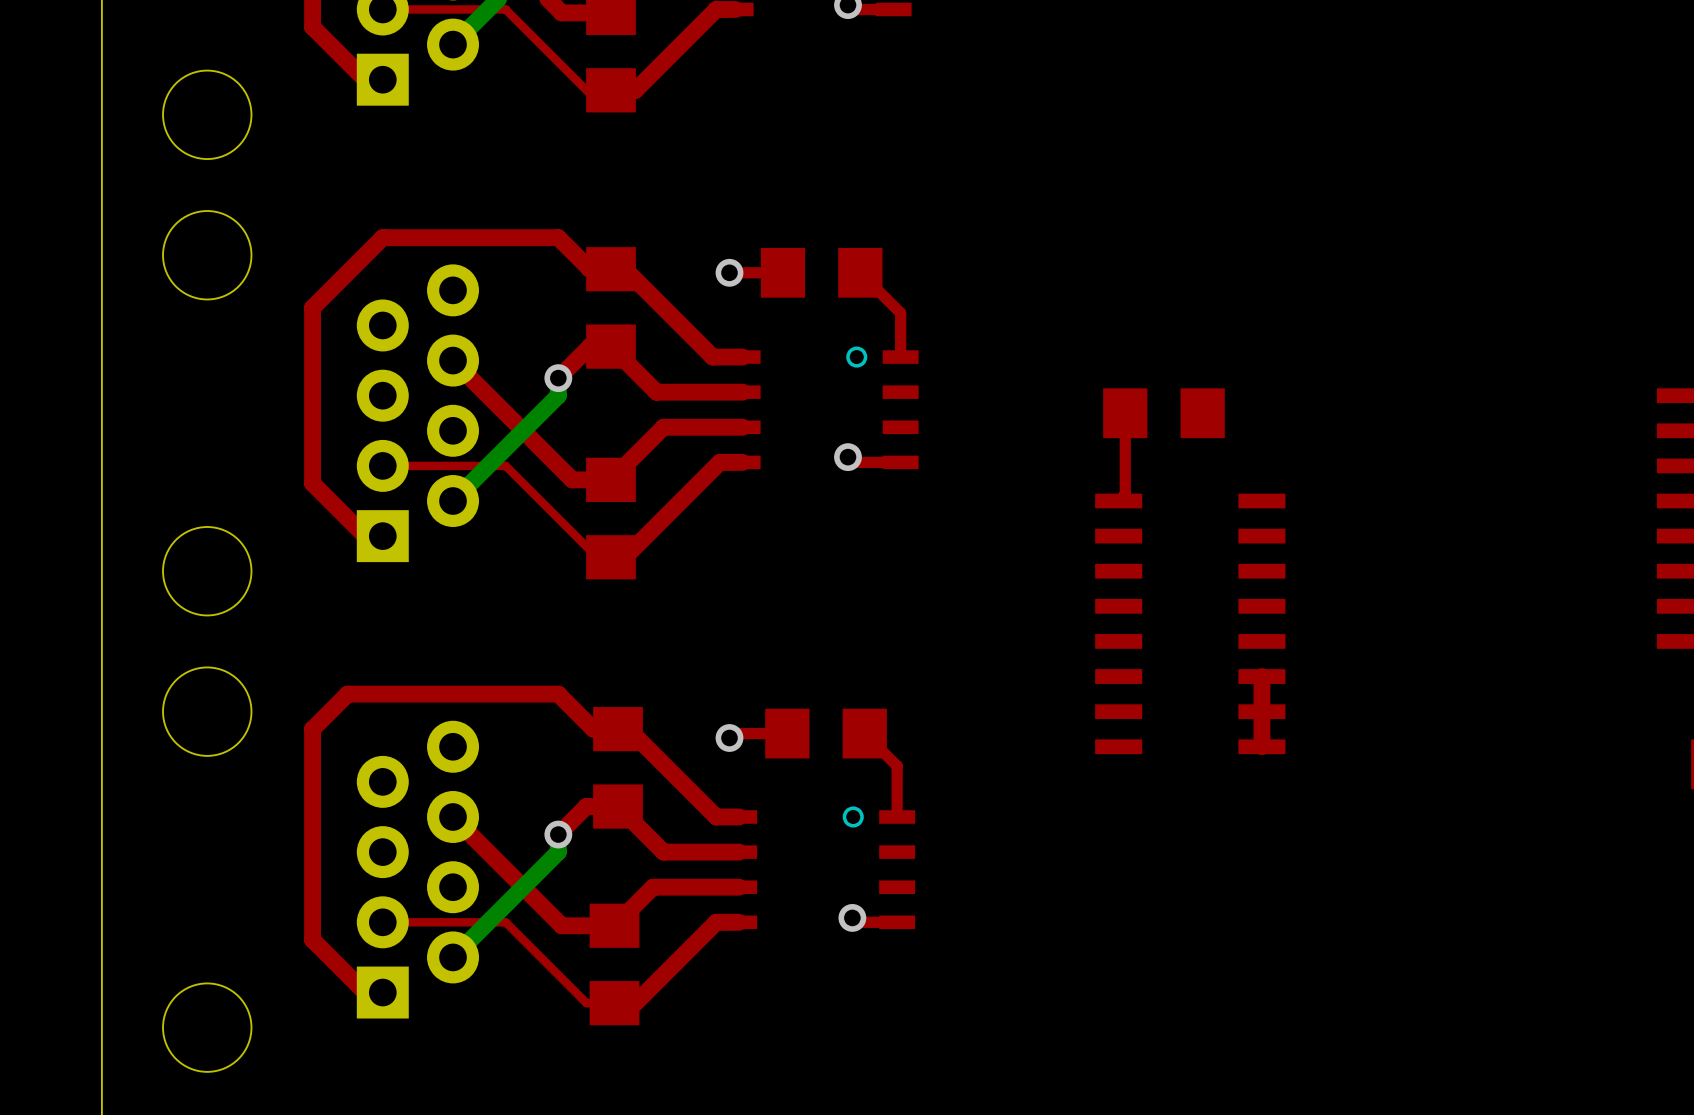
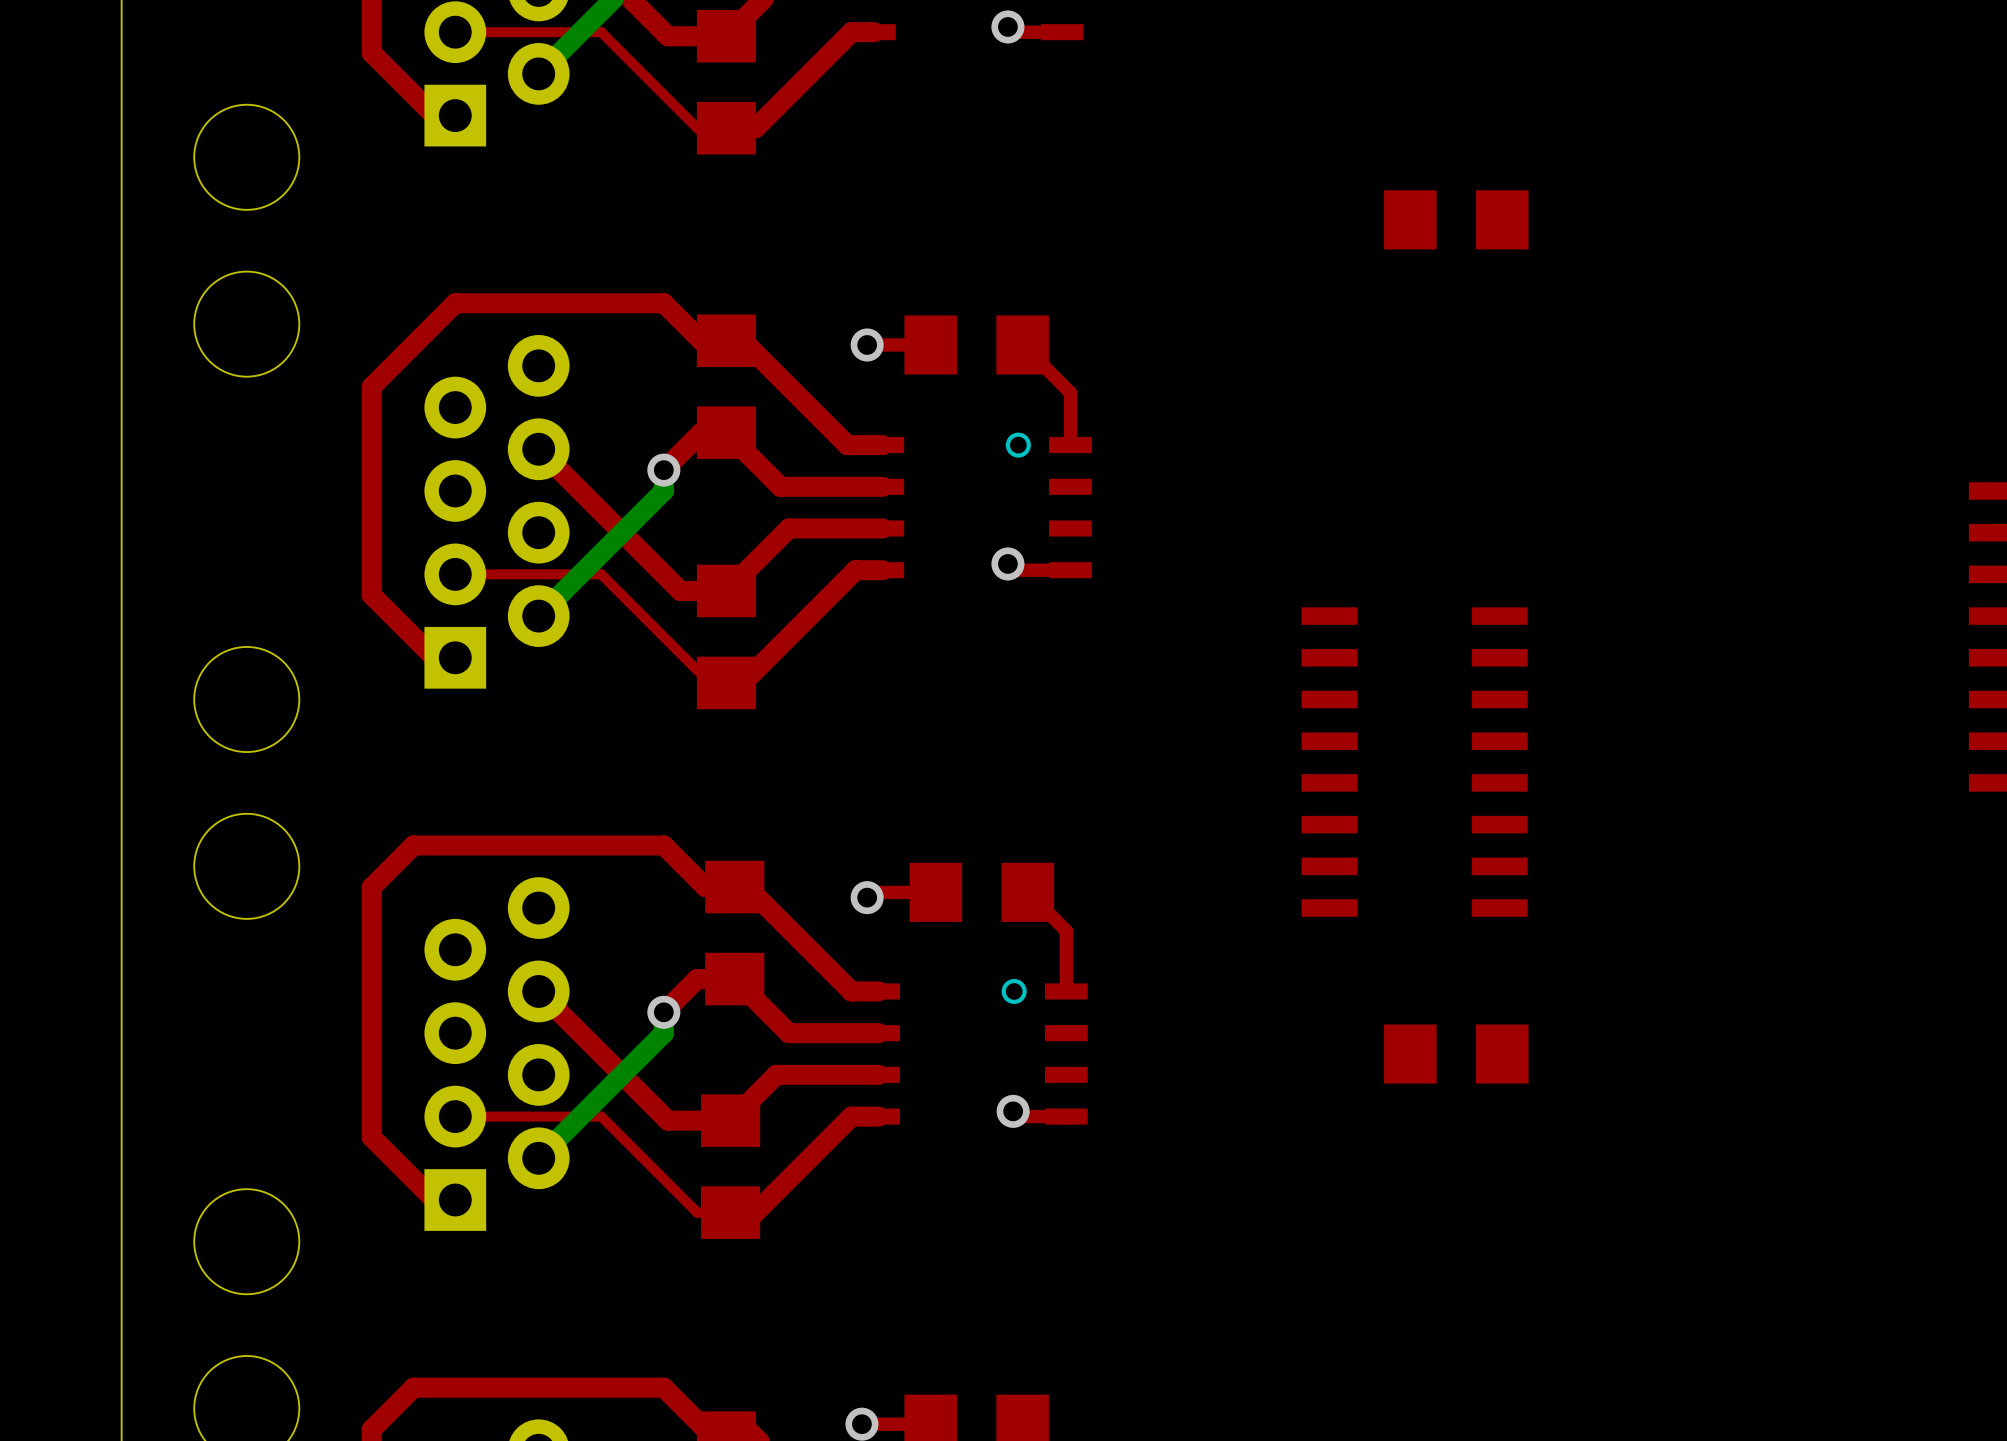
part: none -> (1456, 219)
top track: (1125, 413) (1125, 494) (1118, 501) -> none
part: (1163, 413) -> none
top track: (1261, 676) (1261, 746) -> none
part: none -> (1456, 1054)

